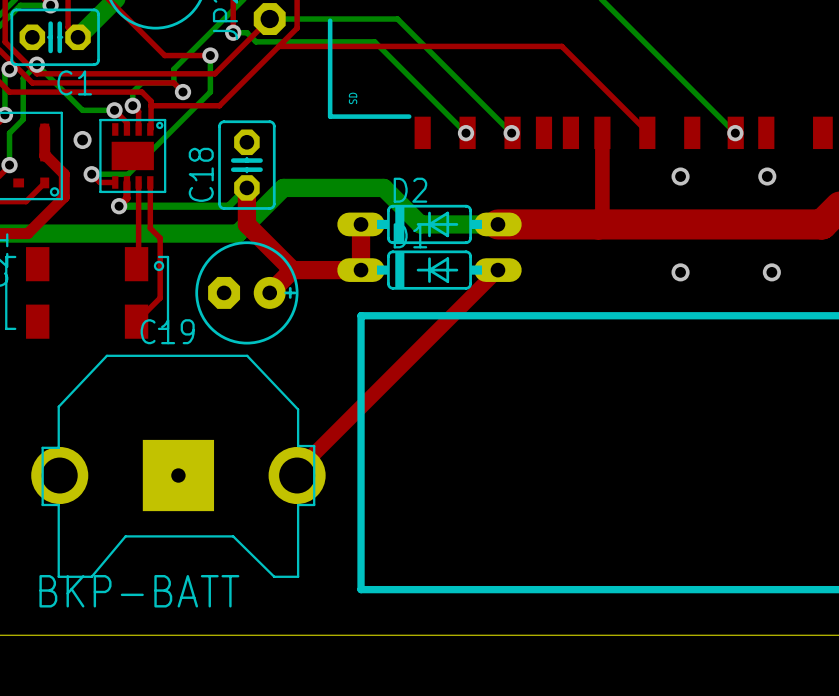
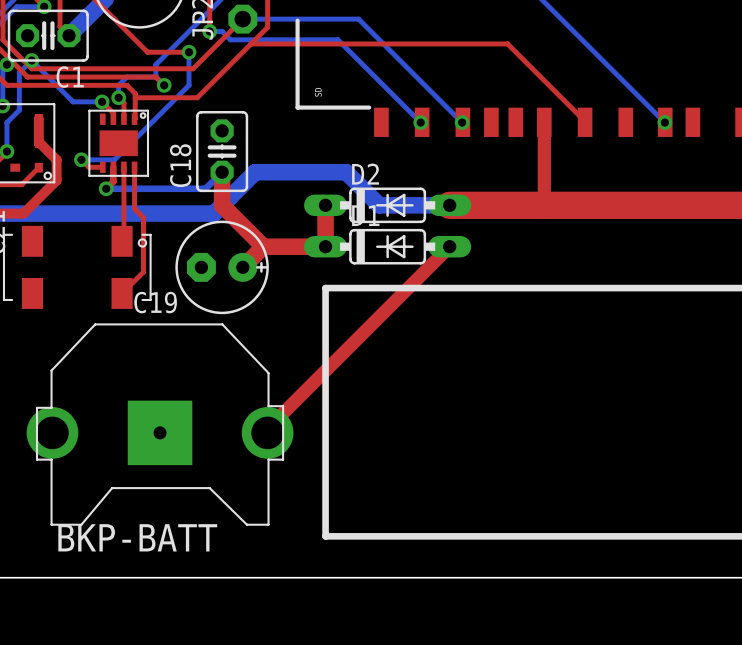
via: (82, 139) -> none
via: (680, 176) -> none
via: (767, 176) -> none
via: (680, 272) -> none
via: (771, 272) -> none

